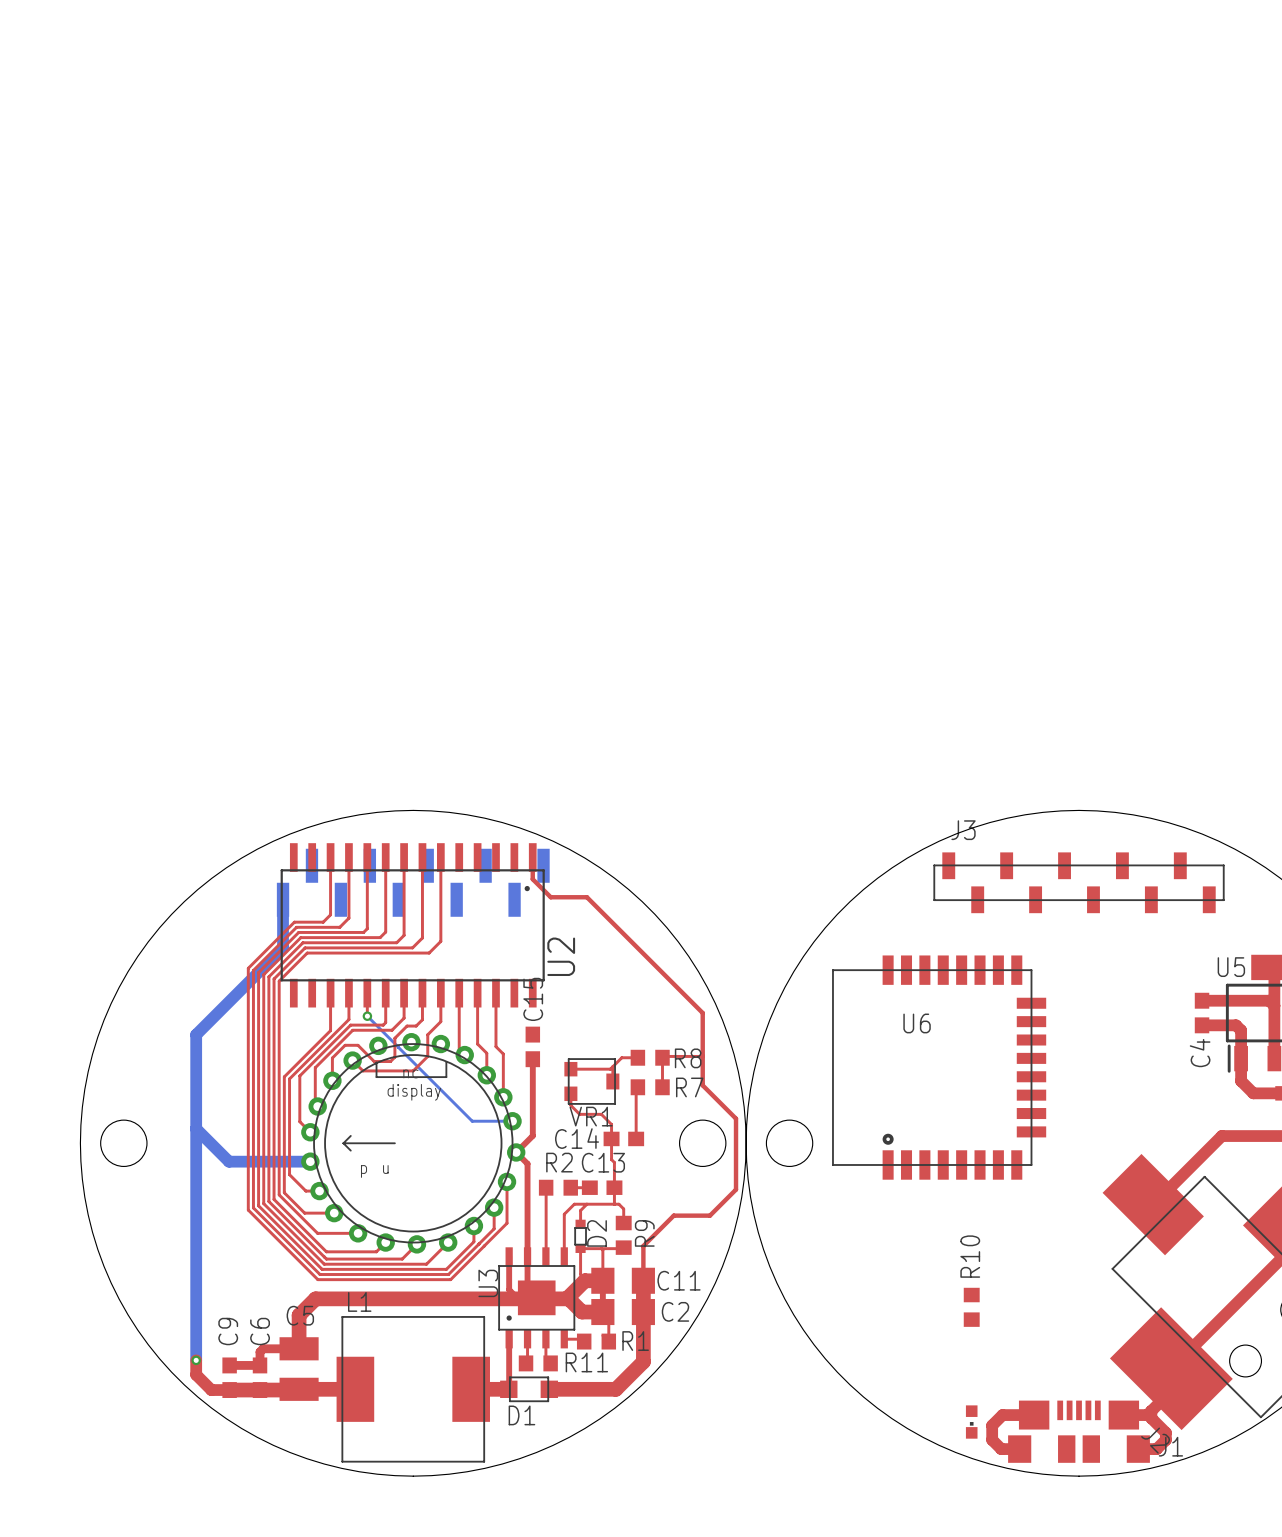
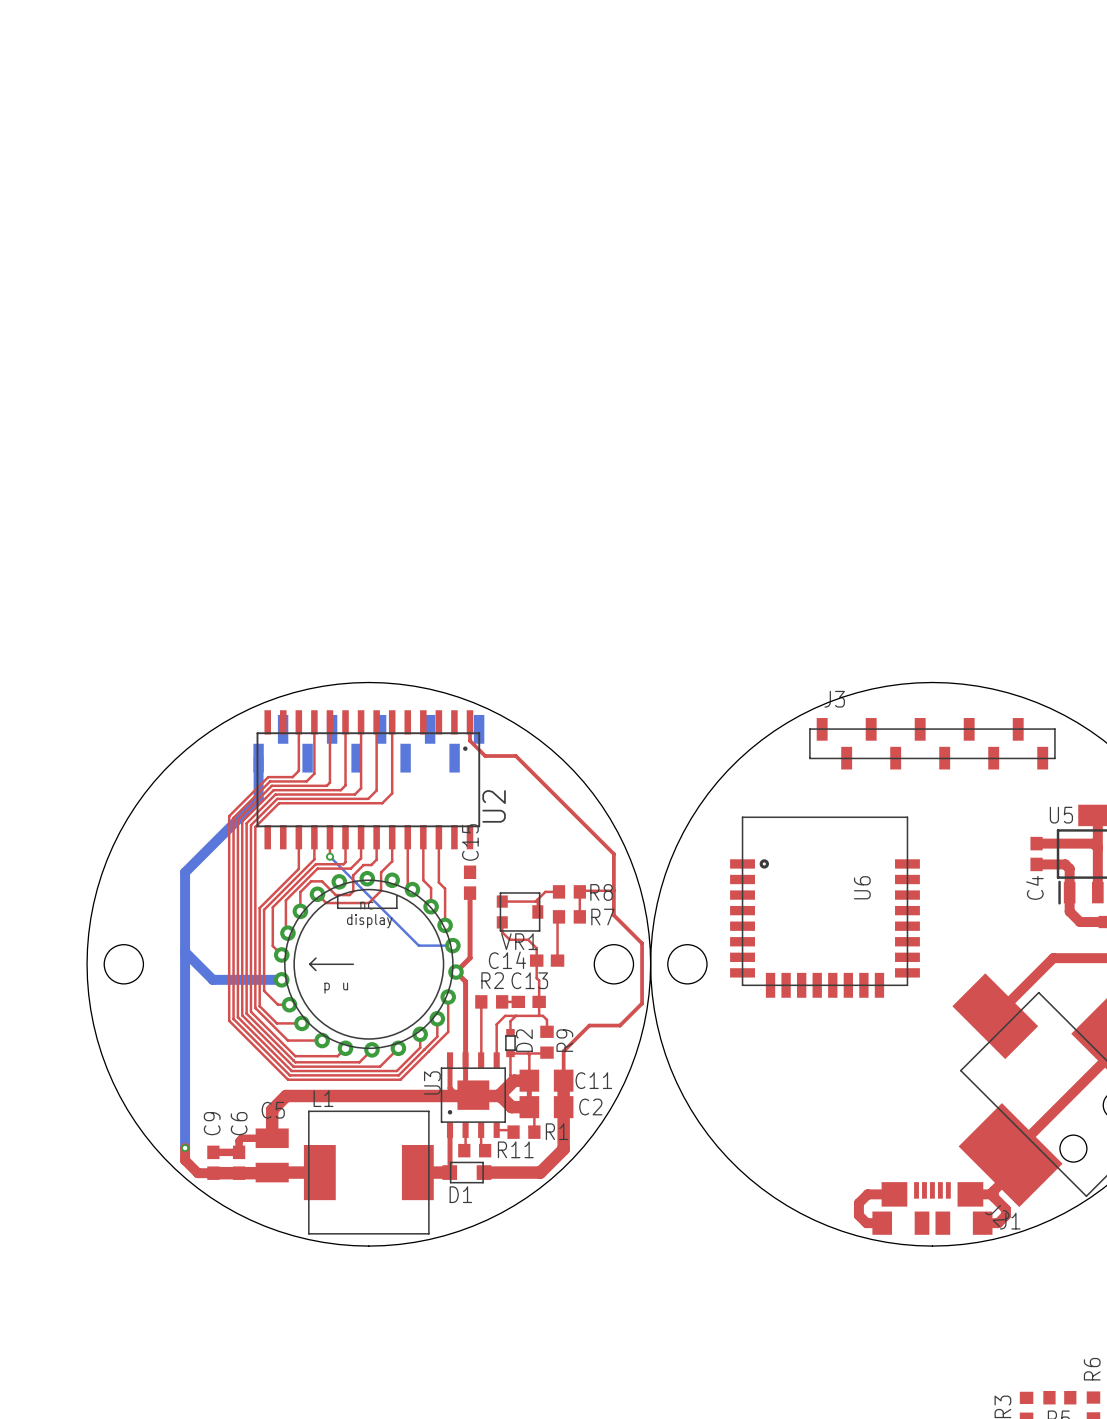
U6 rotation: 0° (939, 1067) -> 90° clockwise (825, 907)
R10: (971, 1307) -> none
part: (971, 1422) -> none

